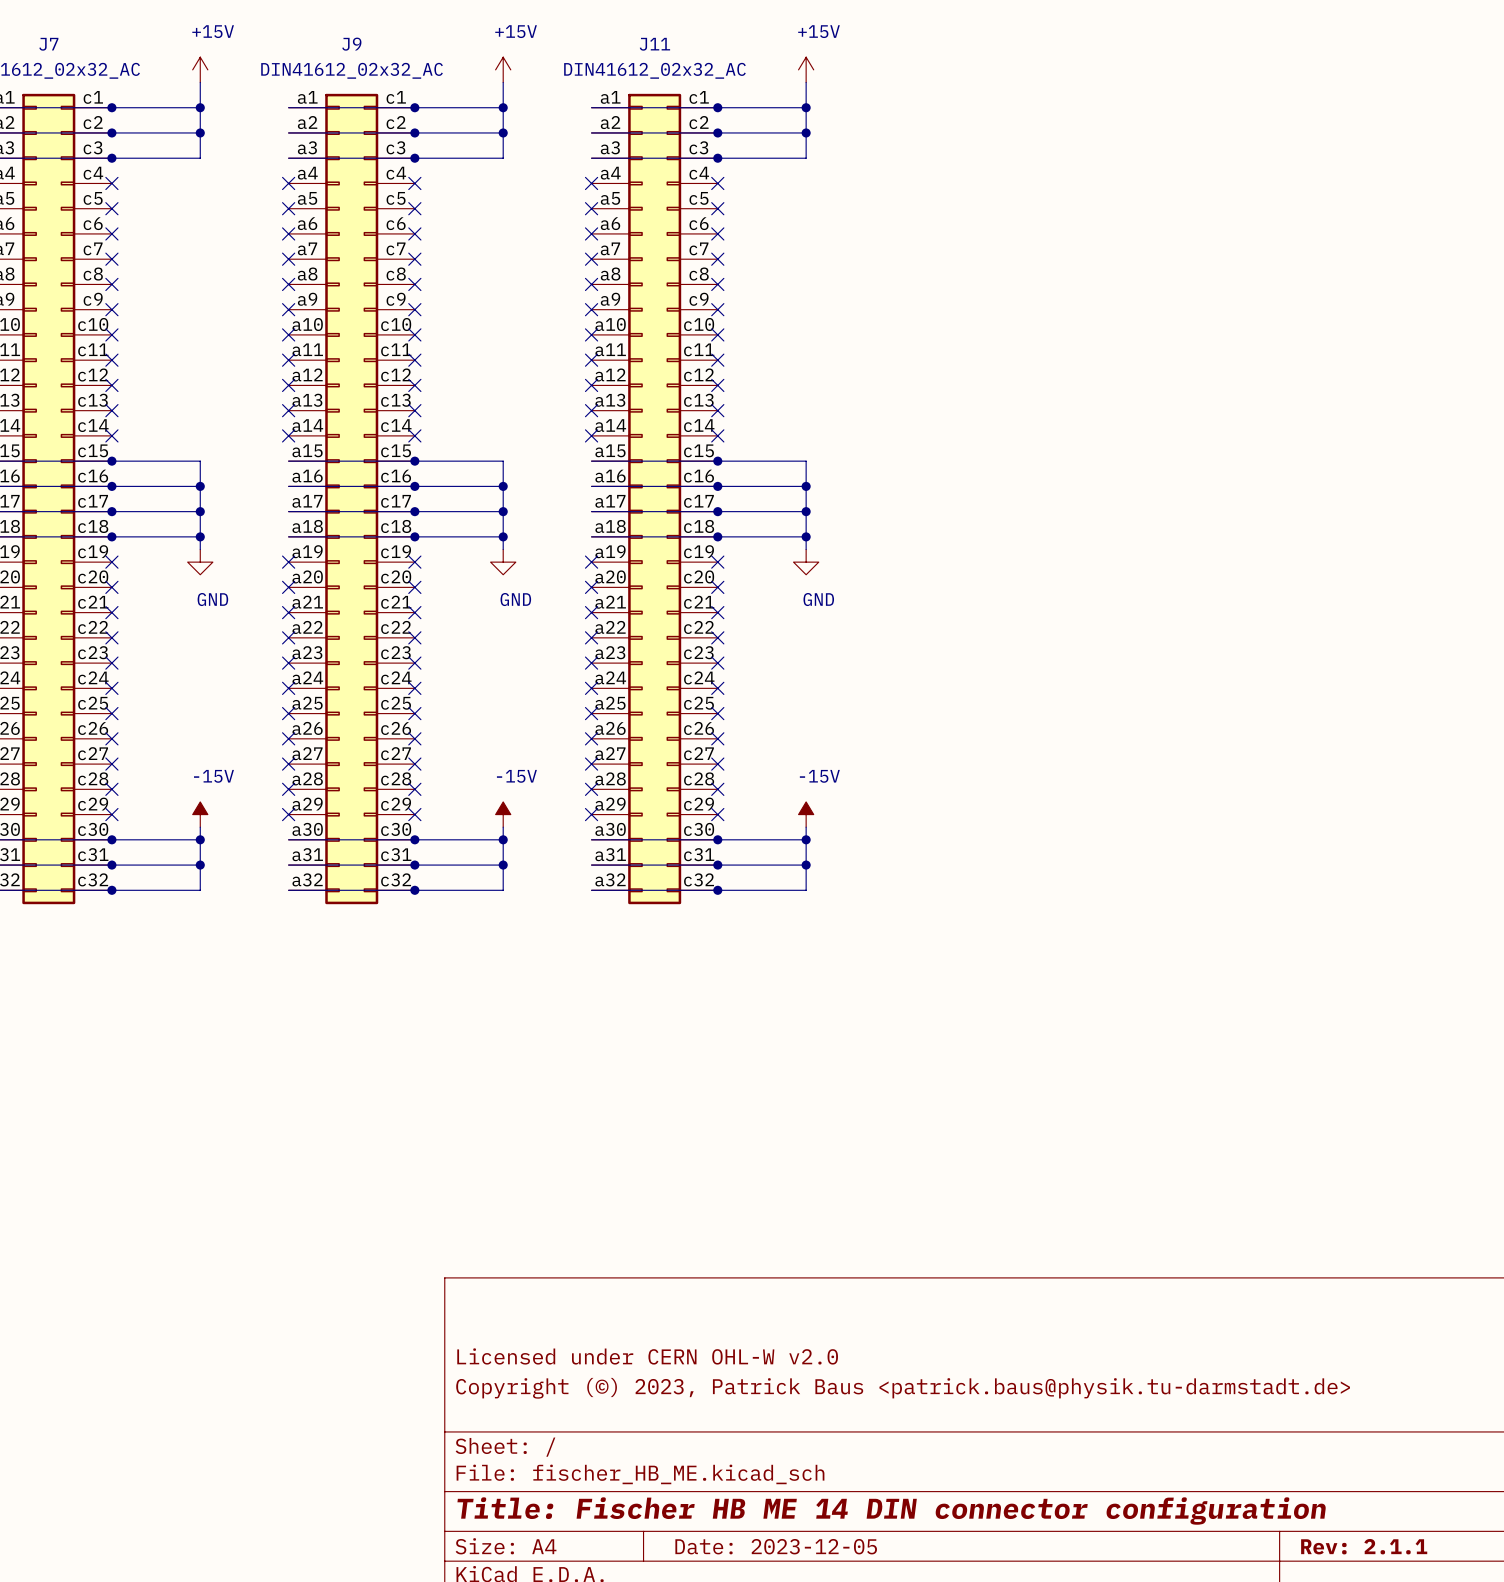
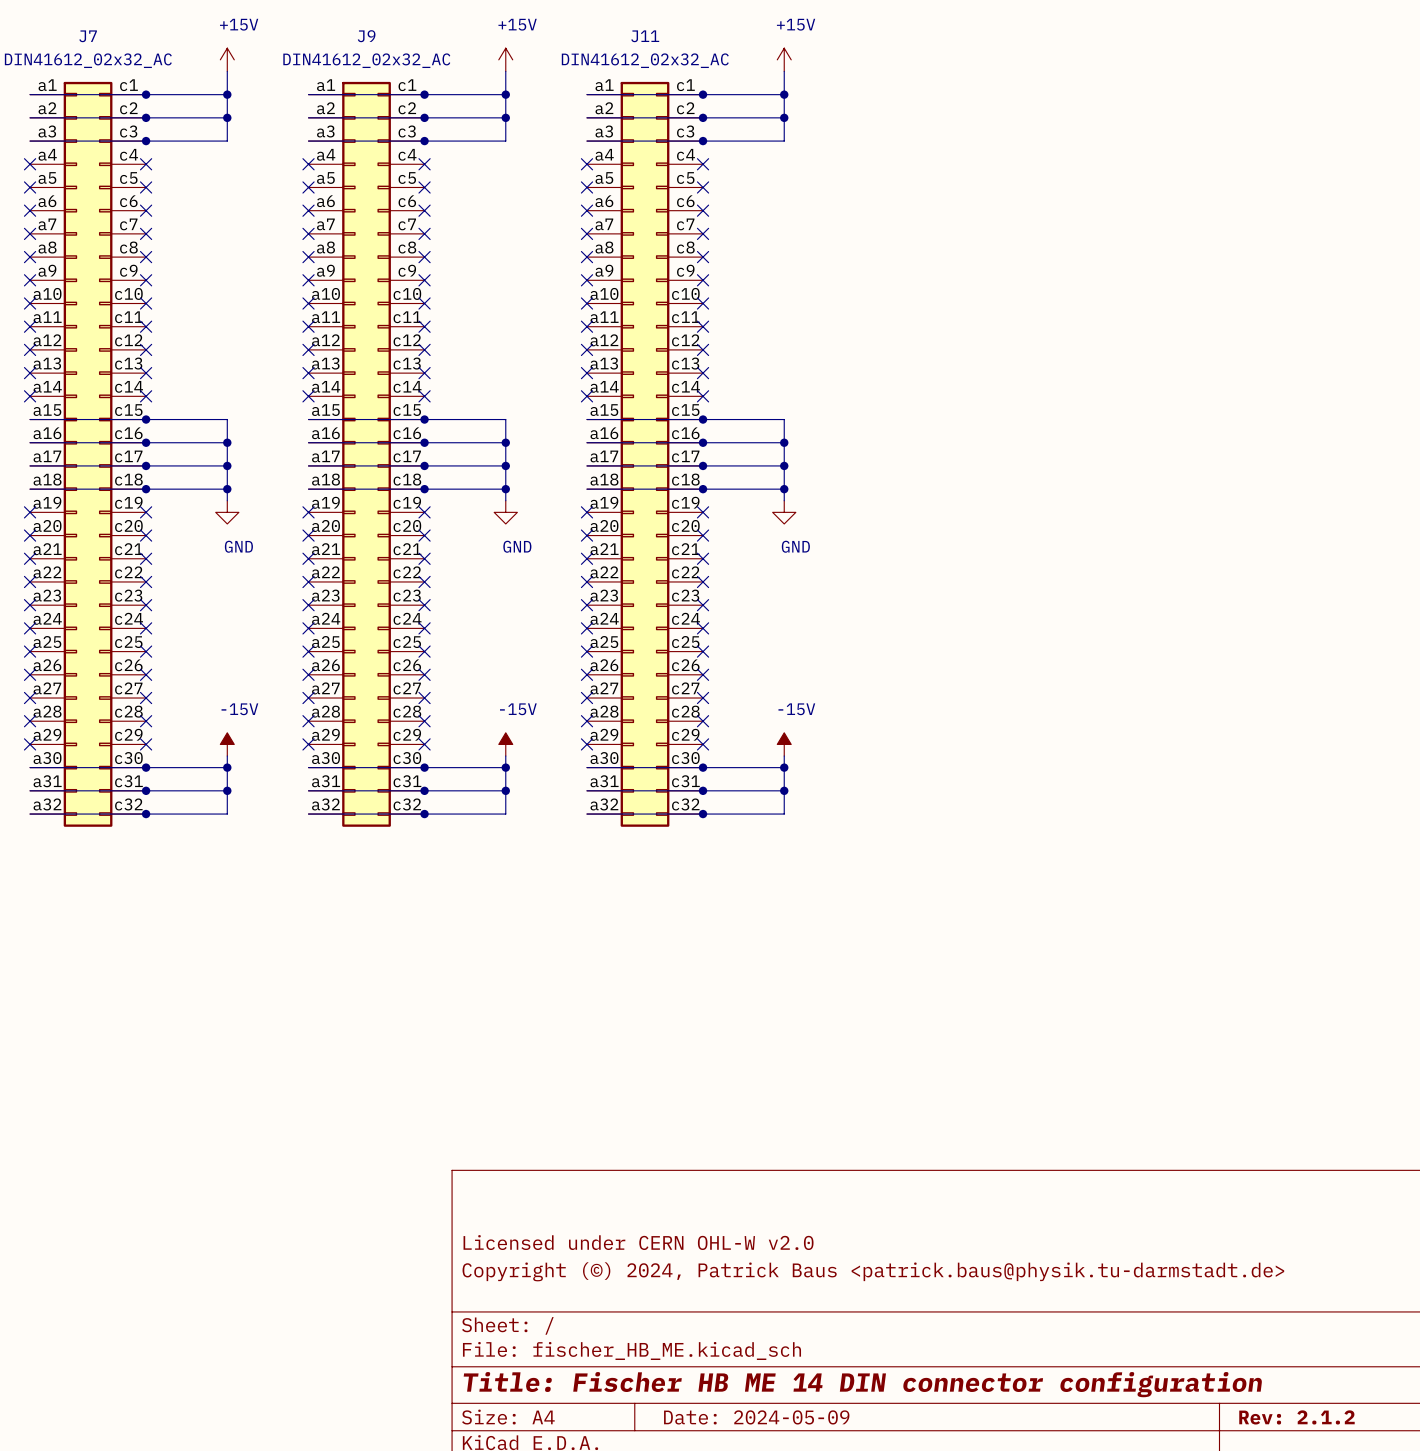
title block: Copyright (©) 2023, Patrick Baus <patrick.baus@physik.tu-darmstadt.de> (903, 1388) -> Copyright (©) 2024, Patrick Baus <patrick.baus@physik.tu-darmstadt.de> (873, 1271)
title block: Date: 2023-12-05 (776, 1546) -> Date: 2024-05-09 (756, 1417)
title block: Rev: 2.1.1 (1364, 1546) -> Rev: 2.1.2 (1296, 1417)

